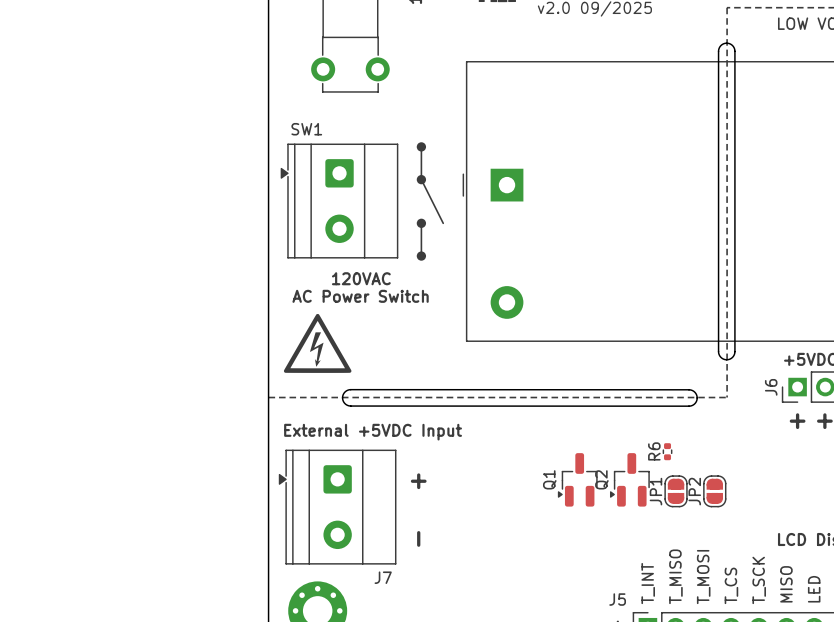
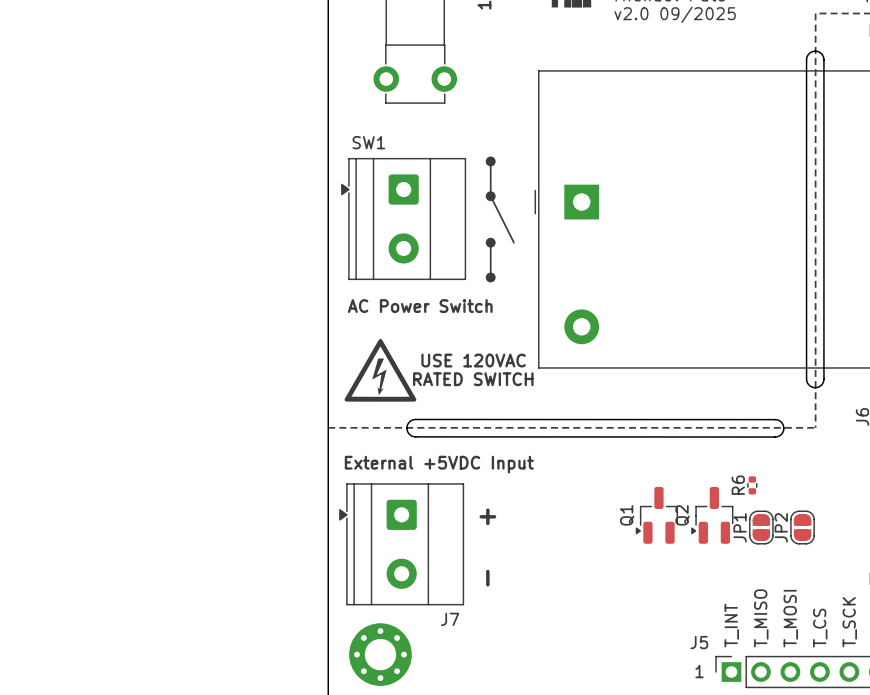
text: 120VAC (361, 278) -> AC Power Switch (420, 306)
text: AC Power Switch (360, 296) -> none
text: none -> USE 120VAC (473, 360)
text: none -> RATED SWITCH (473, 379)

